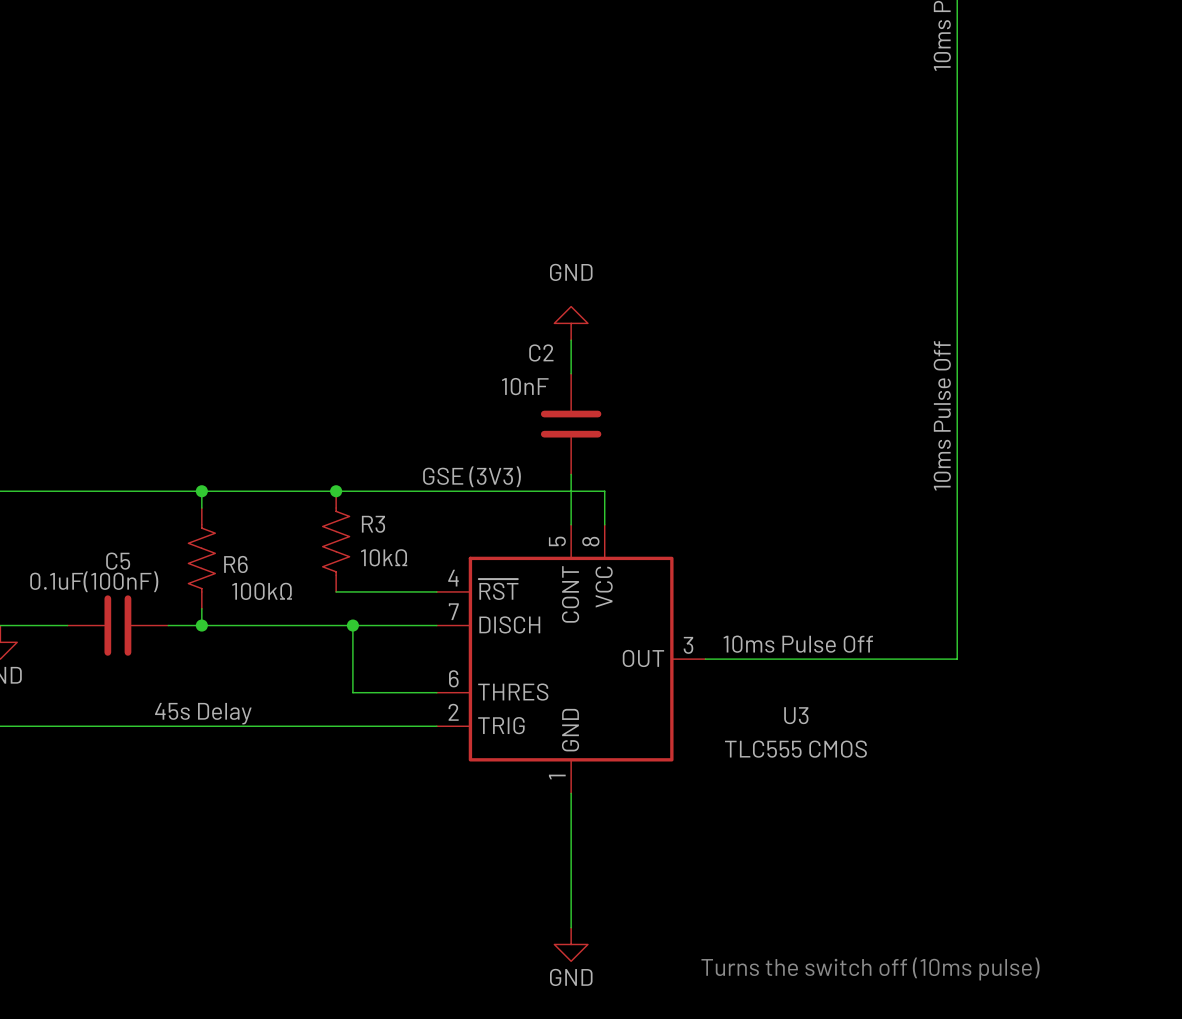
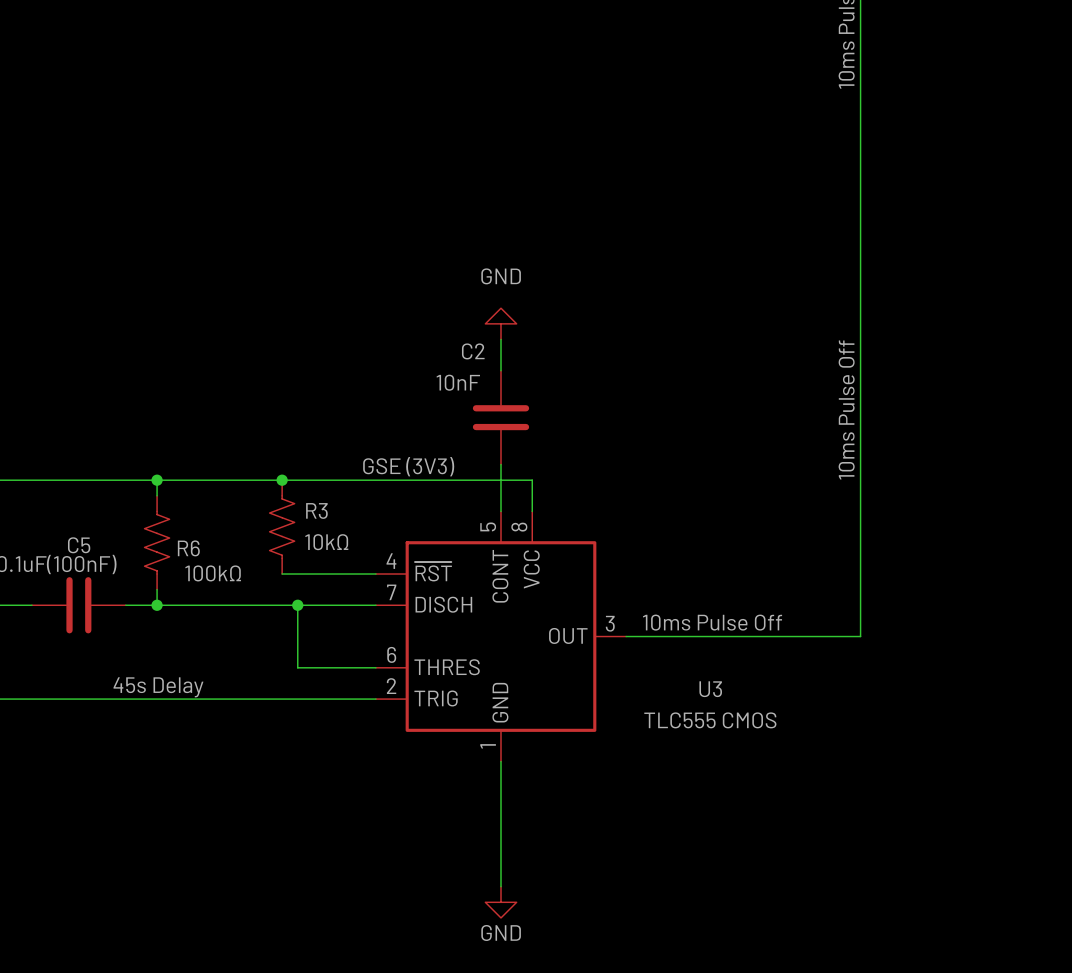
text: Turns the switch off (10ms pulse) (870, 968) -> none

